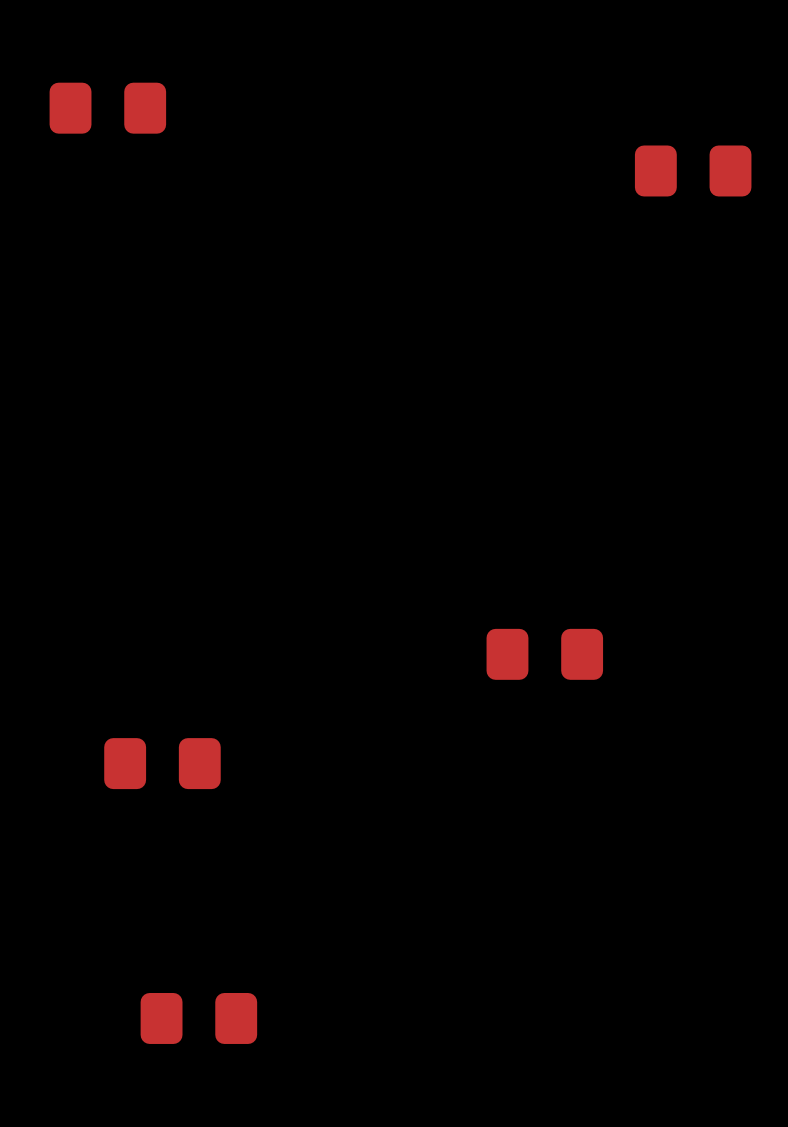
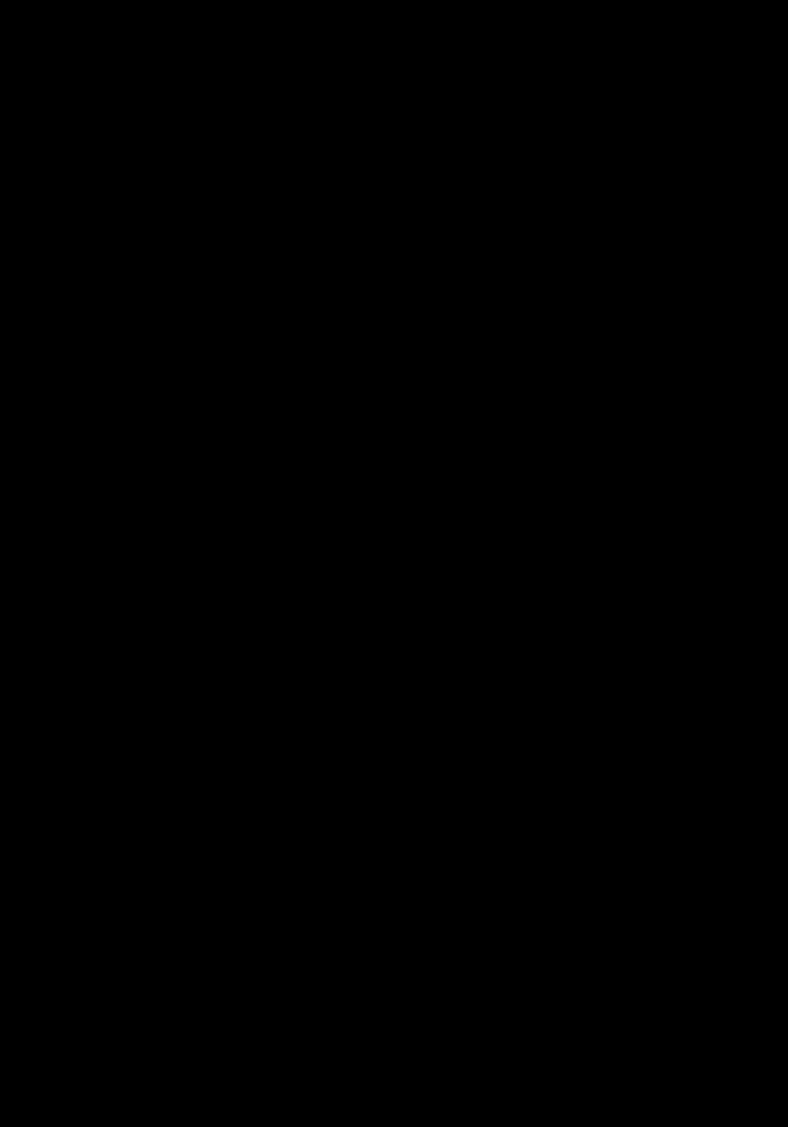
part: (107, 108) -> none
part: (693, 170) -> none
part: (544, 654) -> none
part: (162, 763) -> none
part: (198, 1018) -> none

